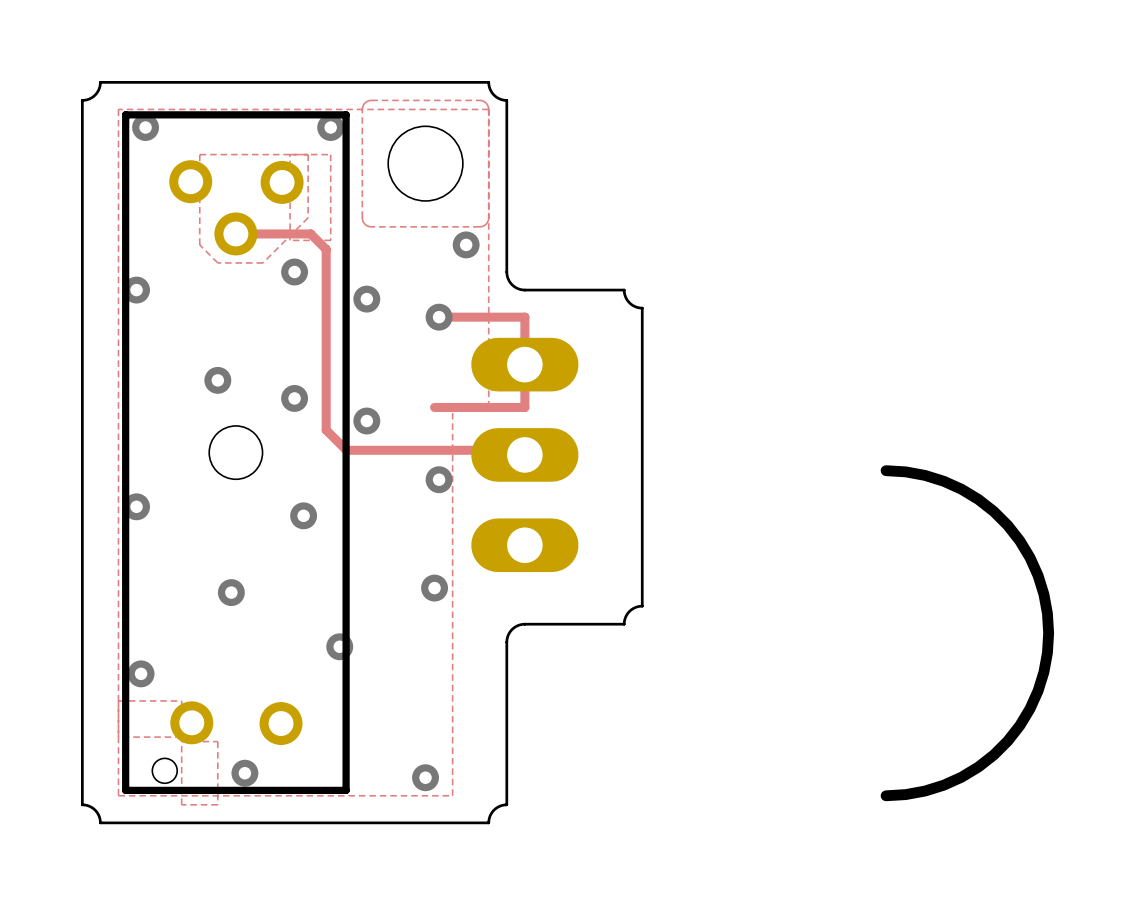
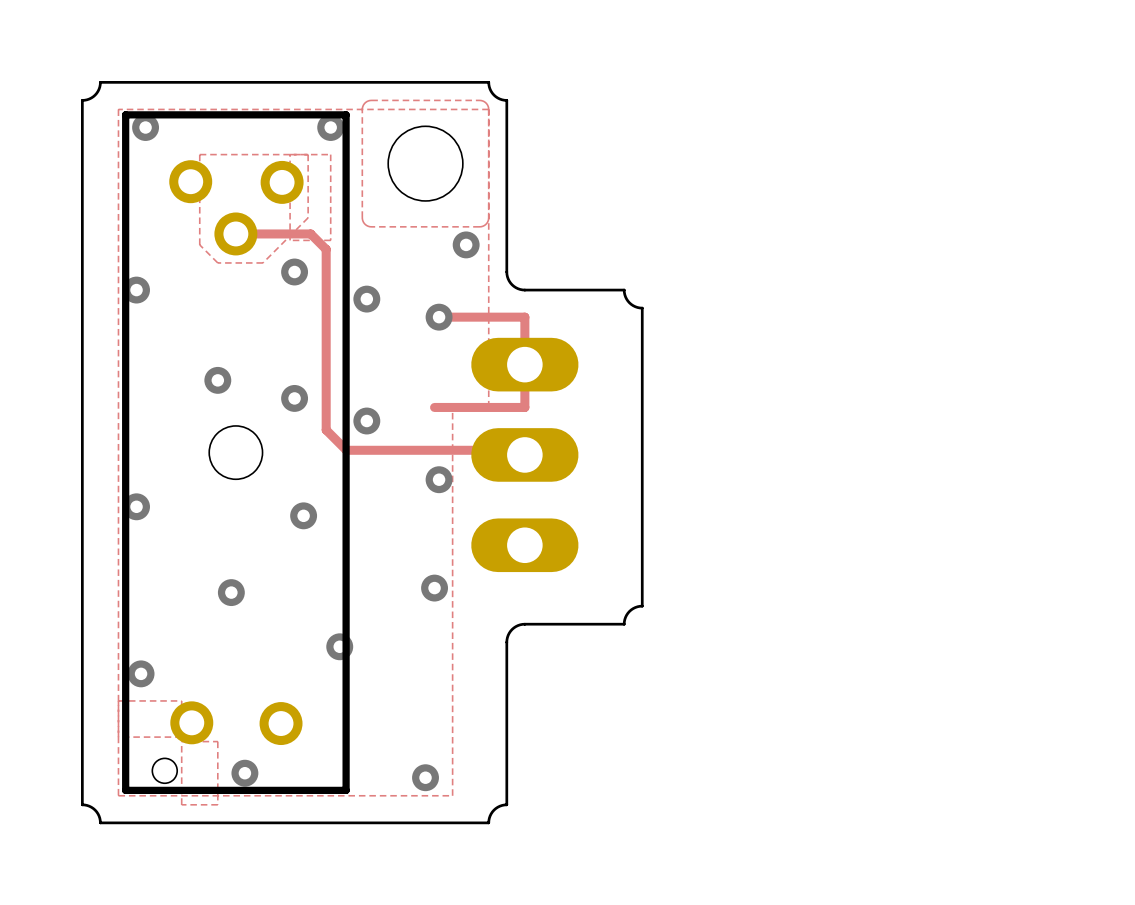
line: (886, 470) (905, 471) (943, 481) (978, 499) (1007, 525) (1019, 540) (1038, 575) (1047, 613) (1048, 633) (1047, 652) (1038, 690) (1019, 725) (993, 754) (978, 767) (943, 785) (905, 794) (886, 795) -> none

